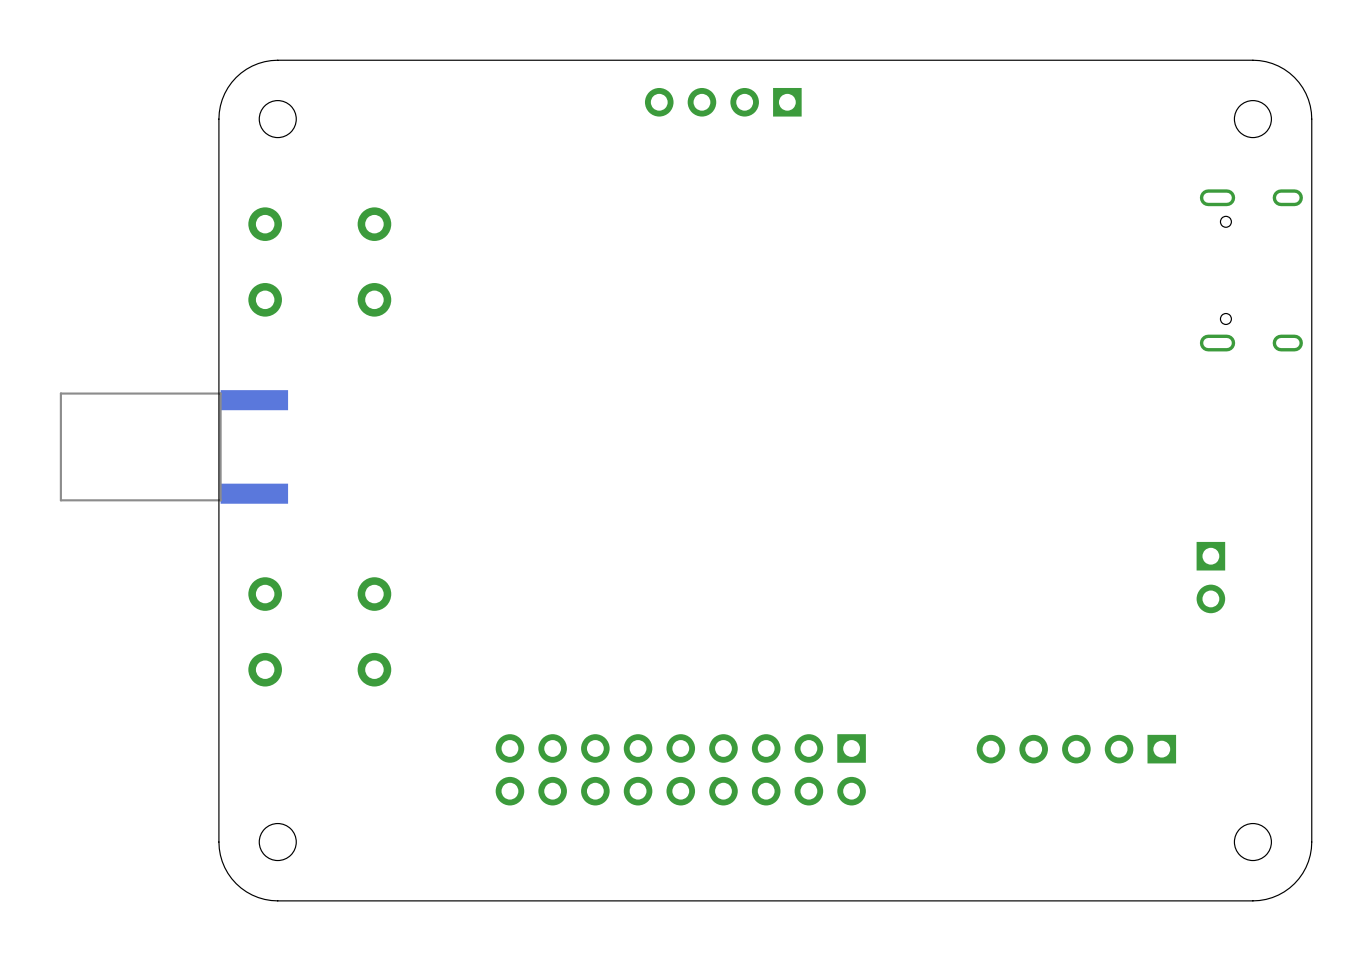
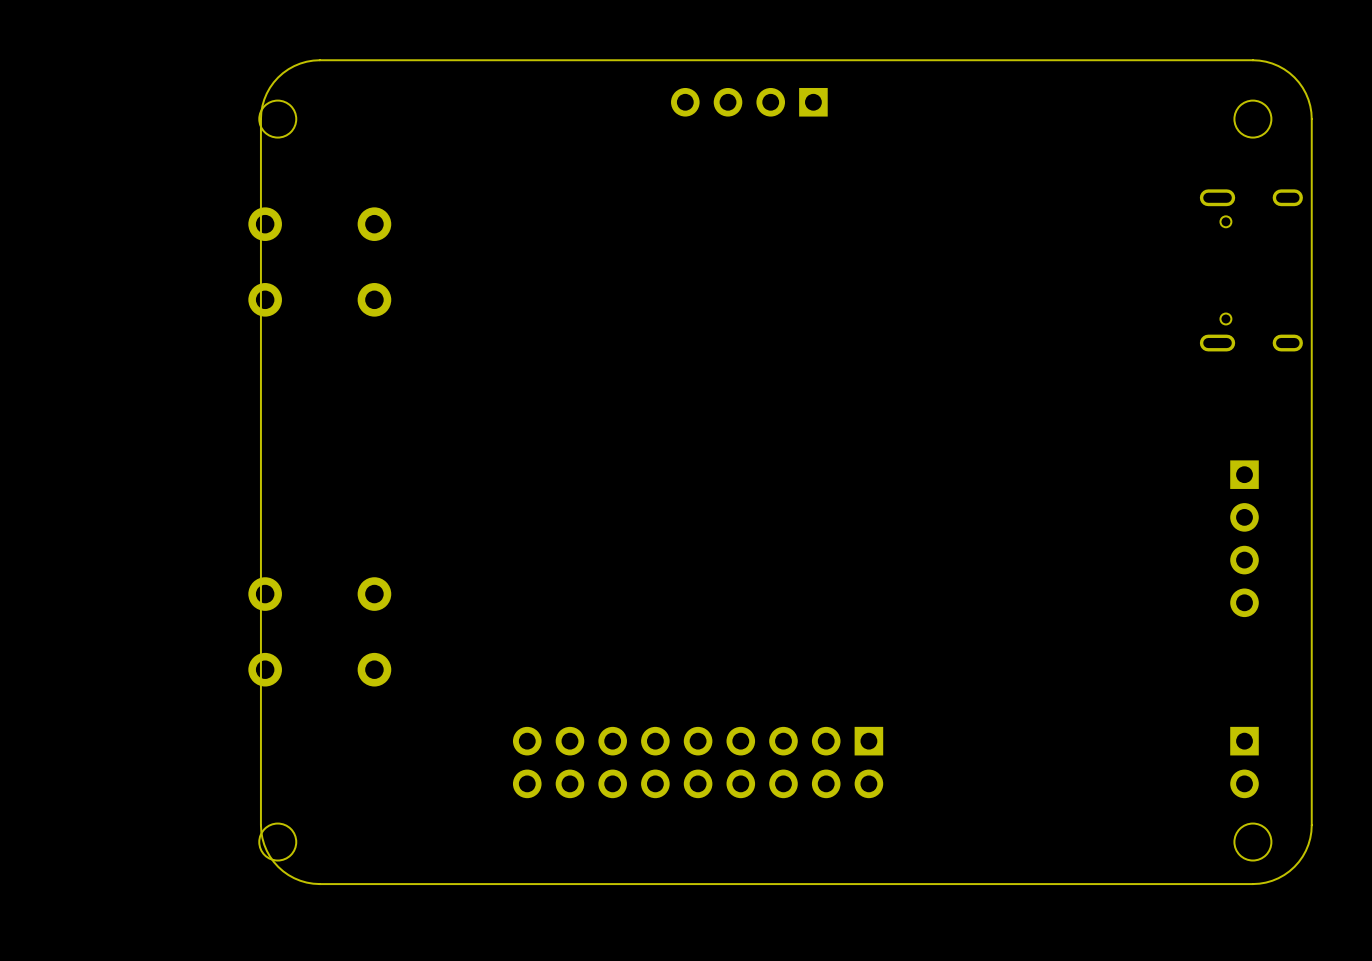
board edge: (319, 60) (271, 60) (252, 66) (241, 73) (227, 87) (219, 112) (218, 842) (224, 867) (241, 888) (258, 897) (277, 900) (1259, 900) (1284, 891) (1302, 873) (1310, 855) (1311, 825) -> (319, 60) (294, 66) (278, 77) (264, 99) (260, 119) (260, 825) (266, 850) (283, 871) (300, 880) (319, 884) (1252, 884) (1278, 878) (1294, 866) (1308, 844) (1311, 825)
part position: (723, 102) -> (749, 102)
part: (173, 446) -> none
part: none -> (1244, 538)
part position: (1210, 577) -> (1244, 762)
part: (1076, 749) -> none
part position: (680, 769) -> (698, 762)

